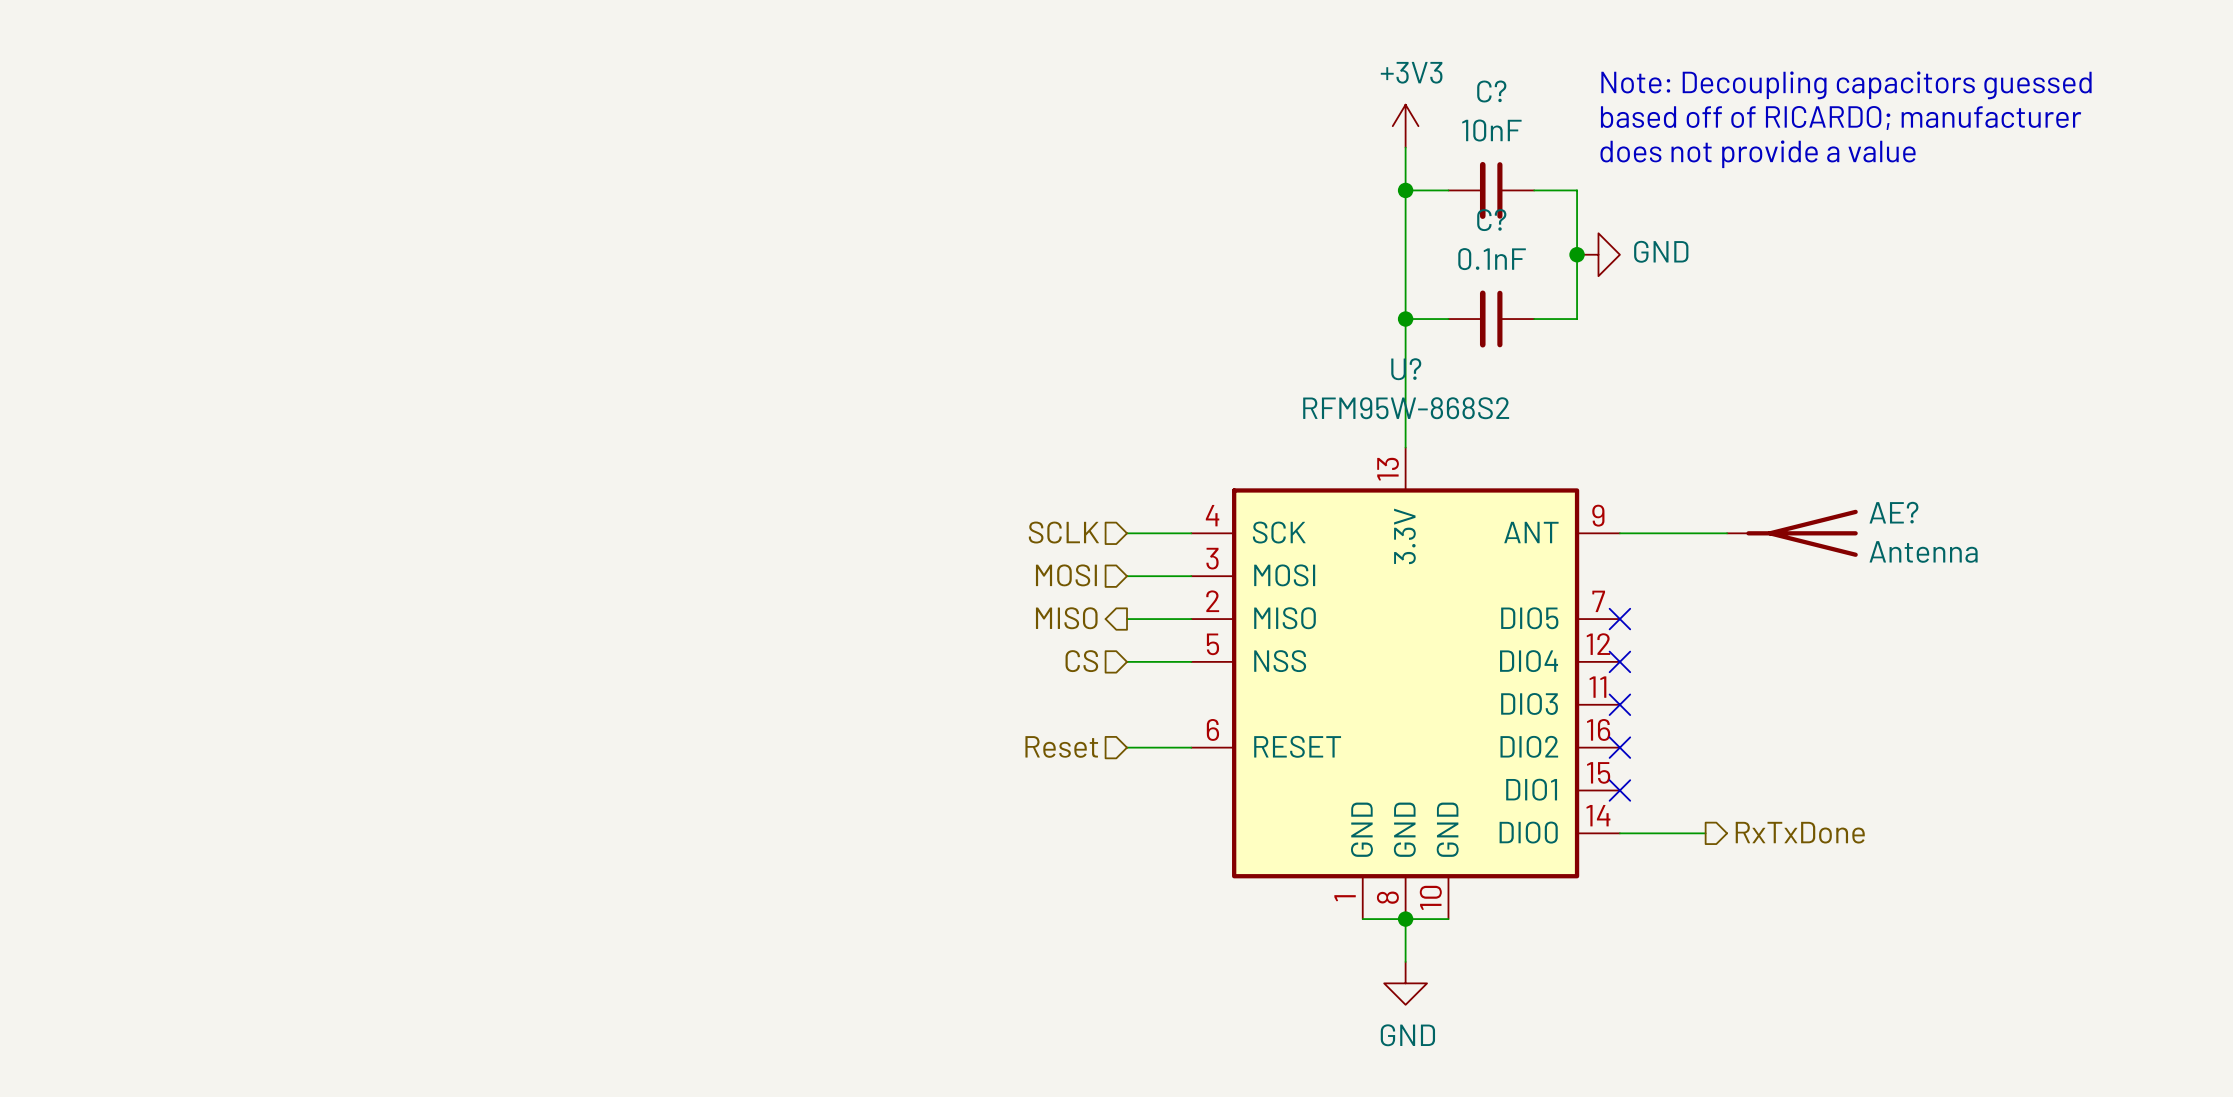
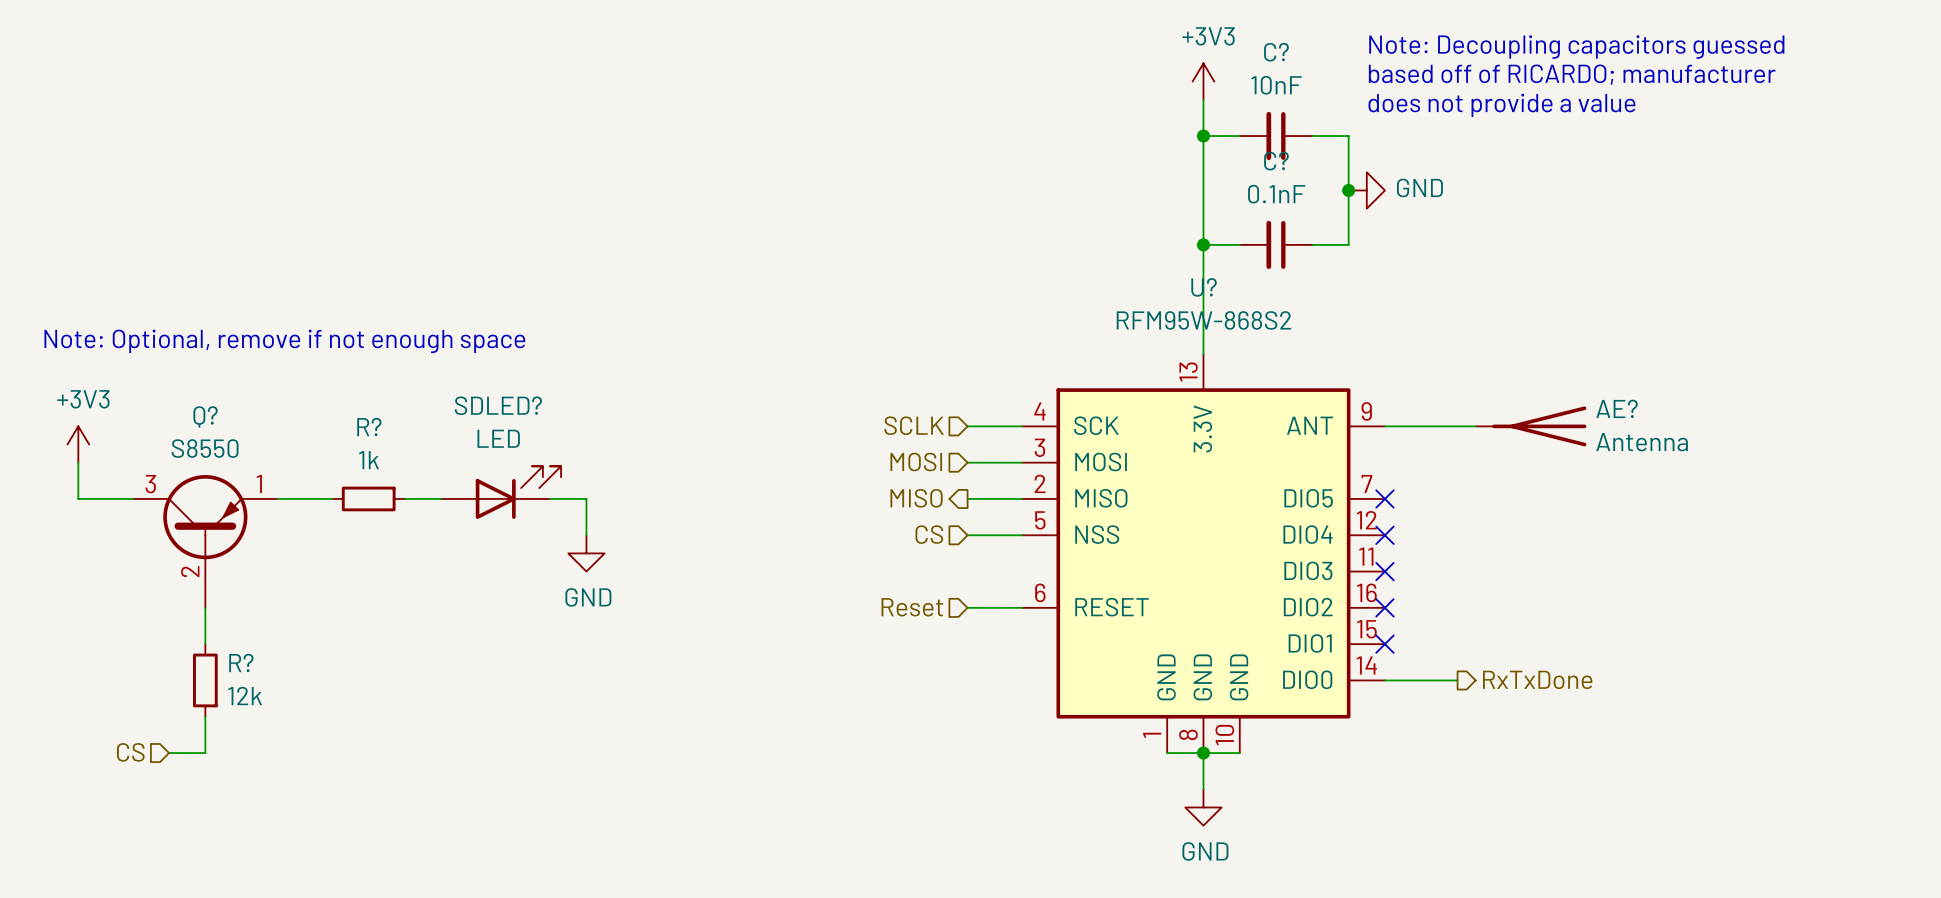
text: none -> Note: Optional, remove if not enough space (284, 341)
power symbol: none -> +3V3 (78, 444)
wire: none -> (78, 462) (78, 498) (132, 498)
SDLED?: none -> LED (501, 492)
wire: none -> (277, 498) (332, 498)
R?: none -> 1k (368, 498)
wire: none -> (404, 498) (441, 498)
wire: none -> (550, 498) (586, 498) (586, 535)
Q?: none -> S8550 (205, 541)
power symbol: none -> GND (586, 553)
wire: none -> (205, 607) (205, 644)
R?: none -> 12k (205, 680)
wire: none -> (205, 716) (205, 753) (169, 753)
hierarchical label: none -> CS (130, 752)

